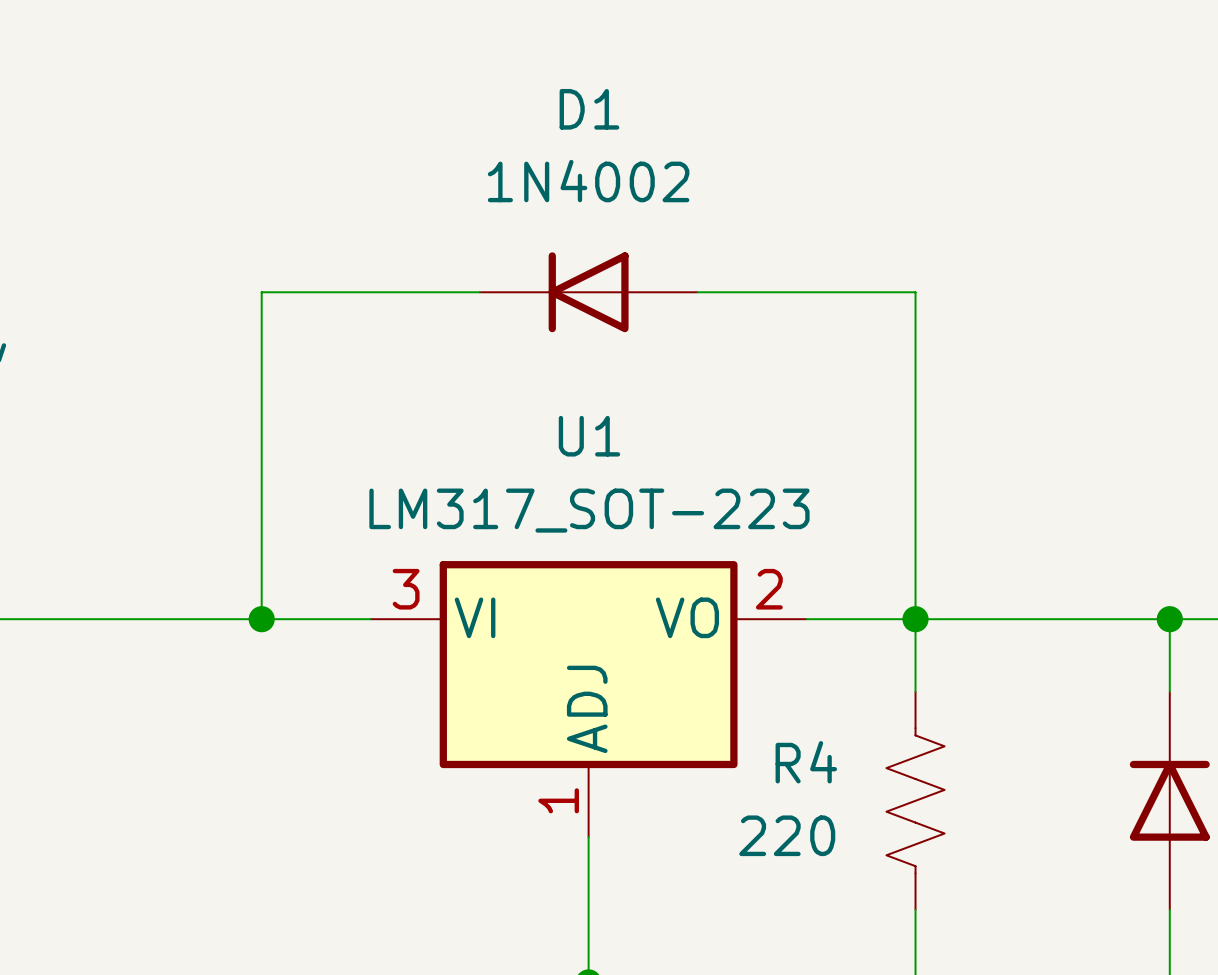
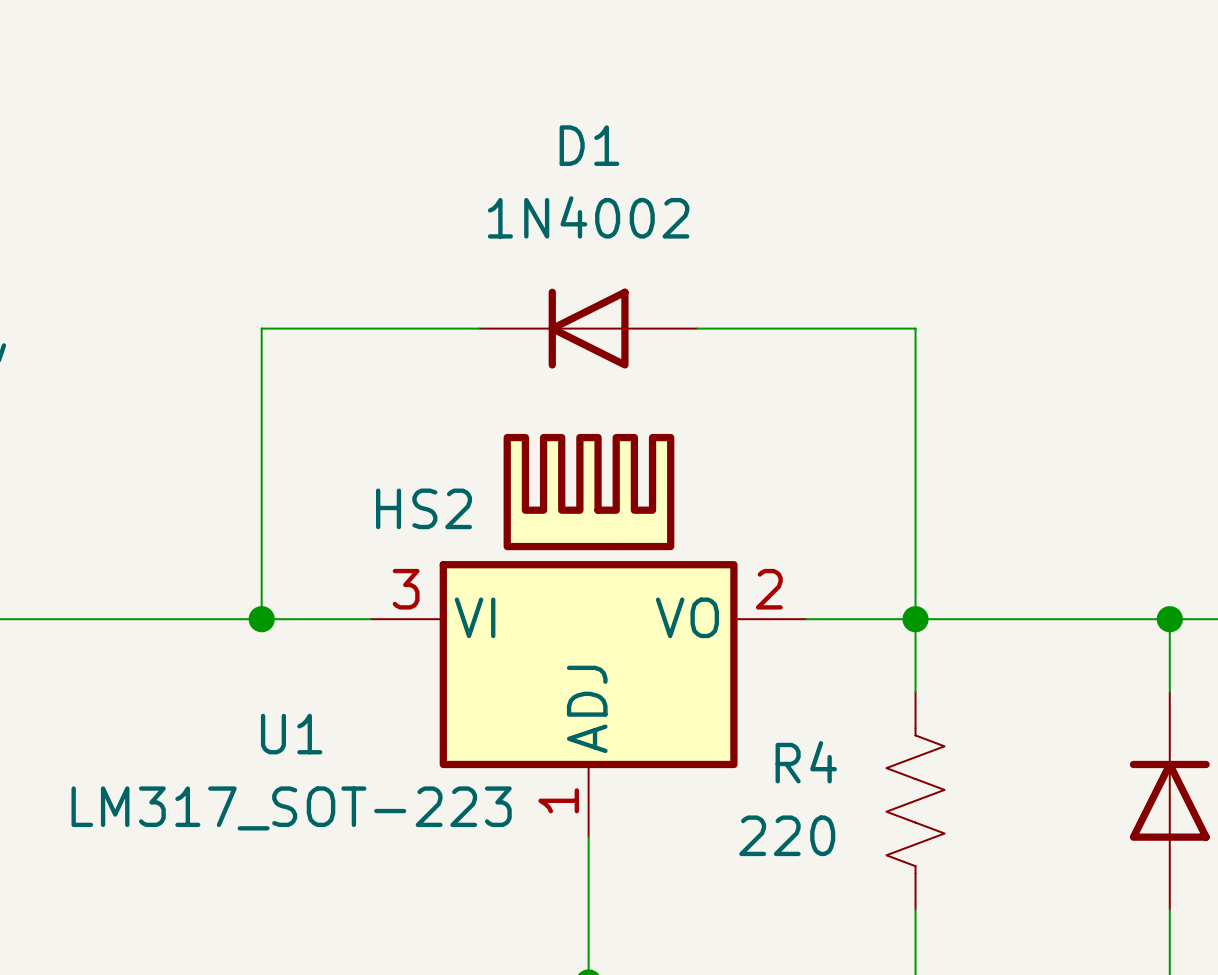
wire: (479, 292) (261, 292) (261, 328) -> (479, 328) (261, 328)
D1 position: (588, 292) -> (588, 328)
wire: (697, 292) (915, 292) (915, 328) -> (697, 328) (915, 328)
U1 name position: U1 (589, 436) -> U1 (291, 734)
HS2: none -> (588, 492)
U1 value position: LM317_SOT-223 (589, 510) -> LM317_SOT-223 (291, 808)

